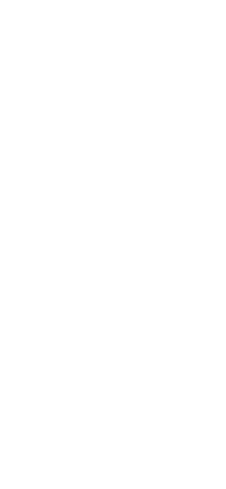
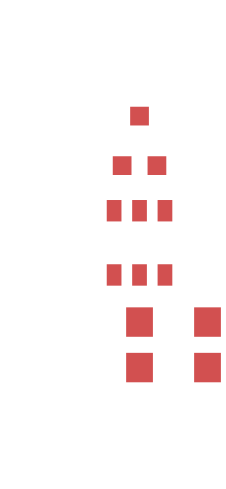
part: none -> (139, 140)
part: none -> (139, 242)
part: none -> (139, 344)
part: none -> (207, 344)

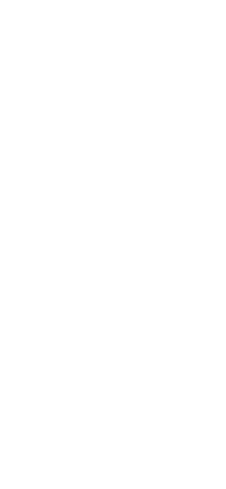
part: (139, 140) -> none
part: (139, 242) -> none
part: (139, 344) -> none
part: (207, 344) -> none

